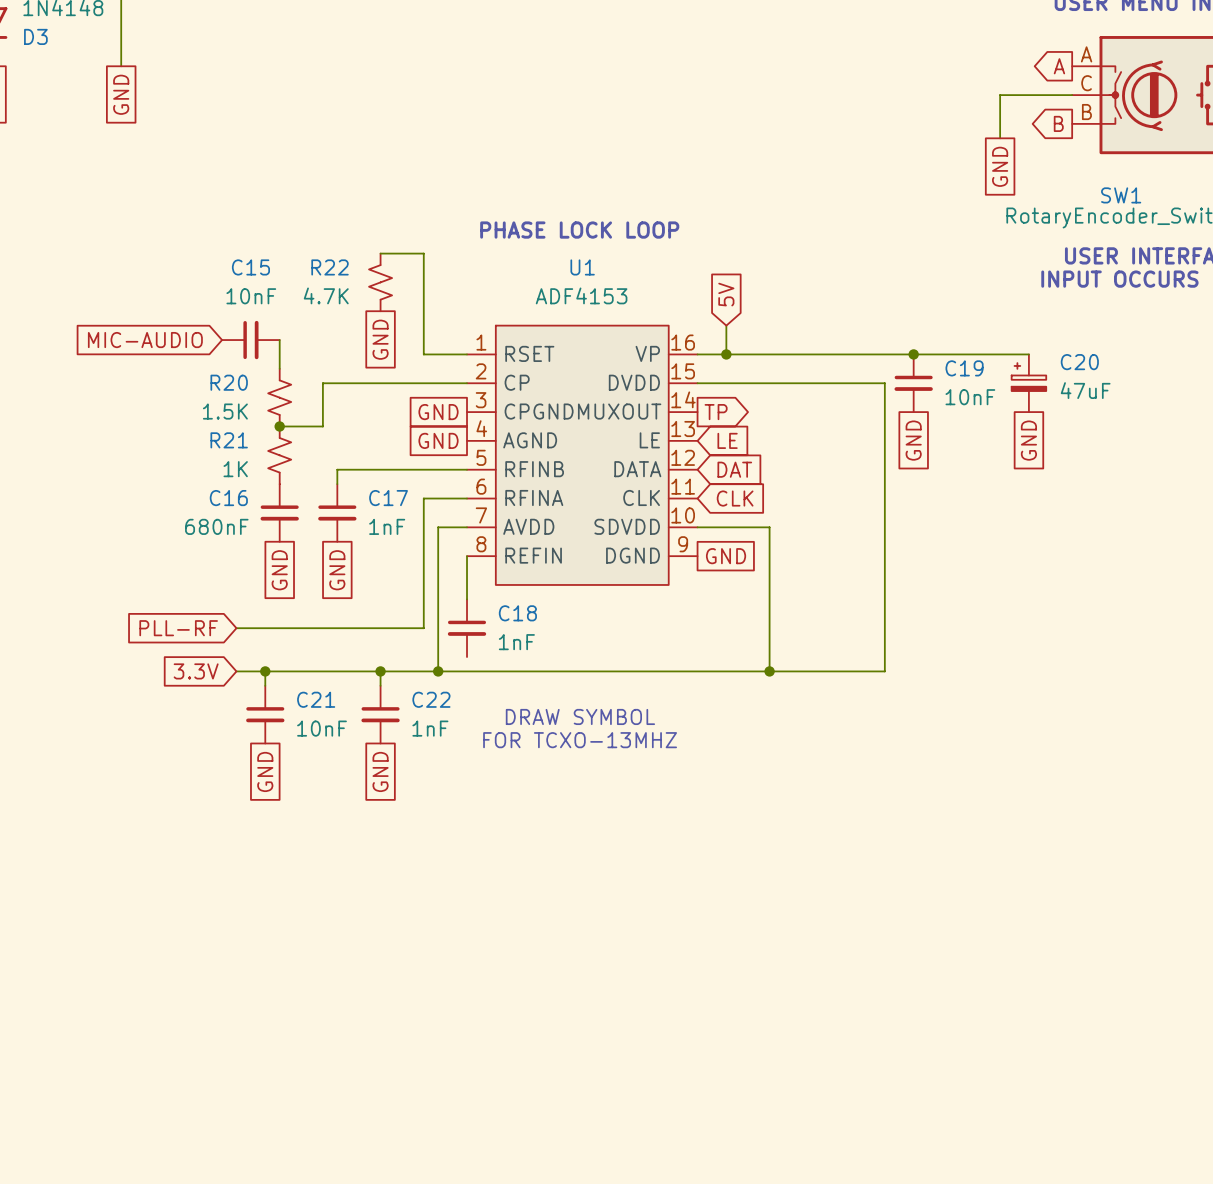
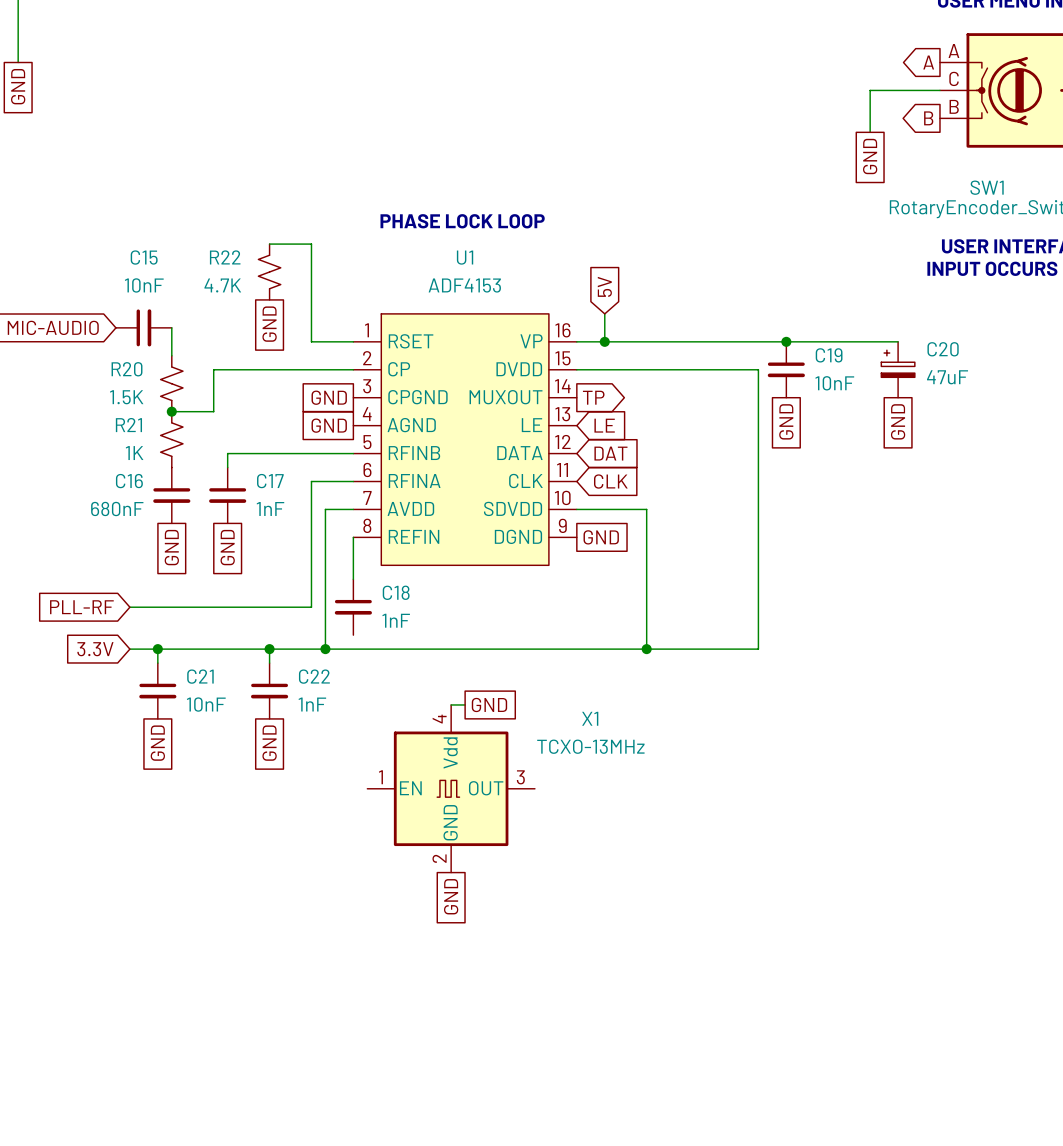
text: DRAW SYMBOL (580, 716) -> none
wire: none -> (451, 704) (465, 704)
global label: none -> GND (489, 704)
text: FOR TCXO-13MHZ (580, 740) -> none
X1: none -> TCXO-13MHz (451, 788)
global label: none -> GND (451, 896)

